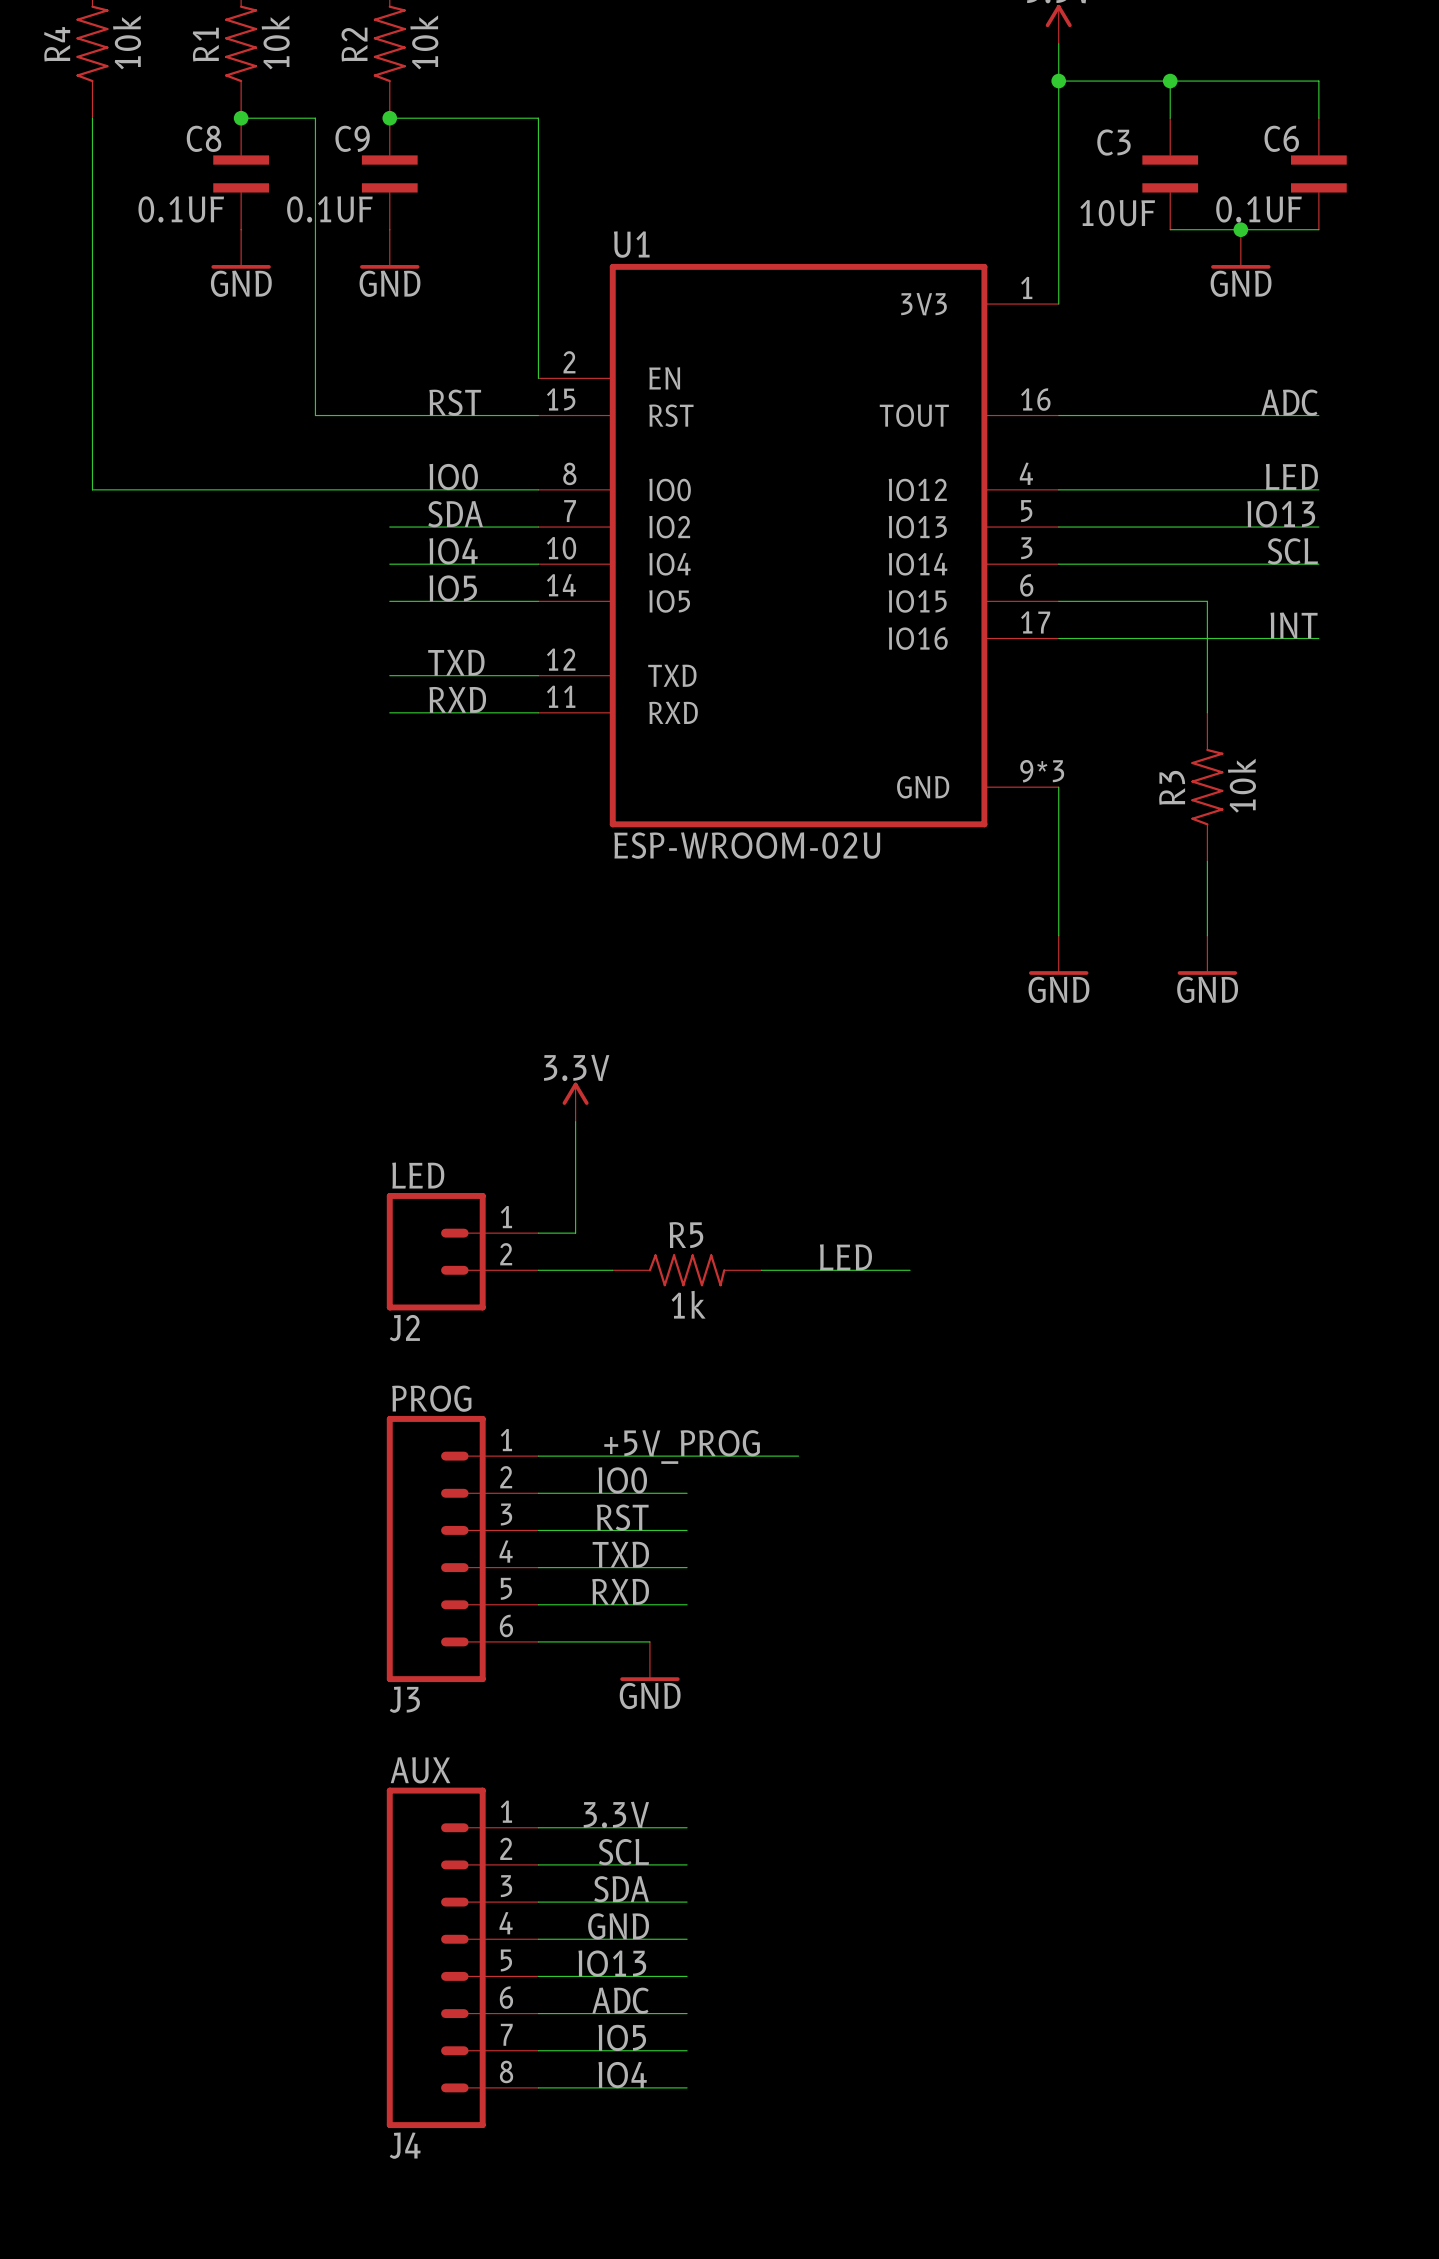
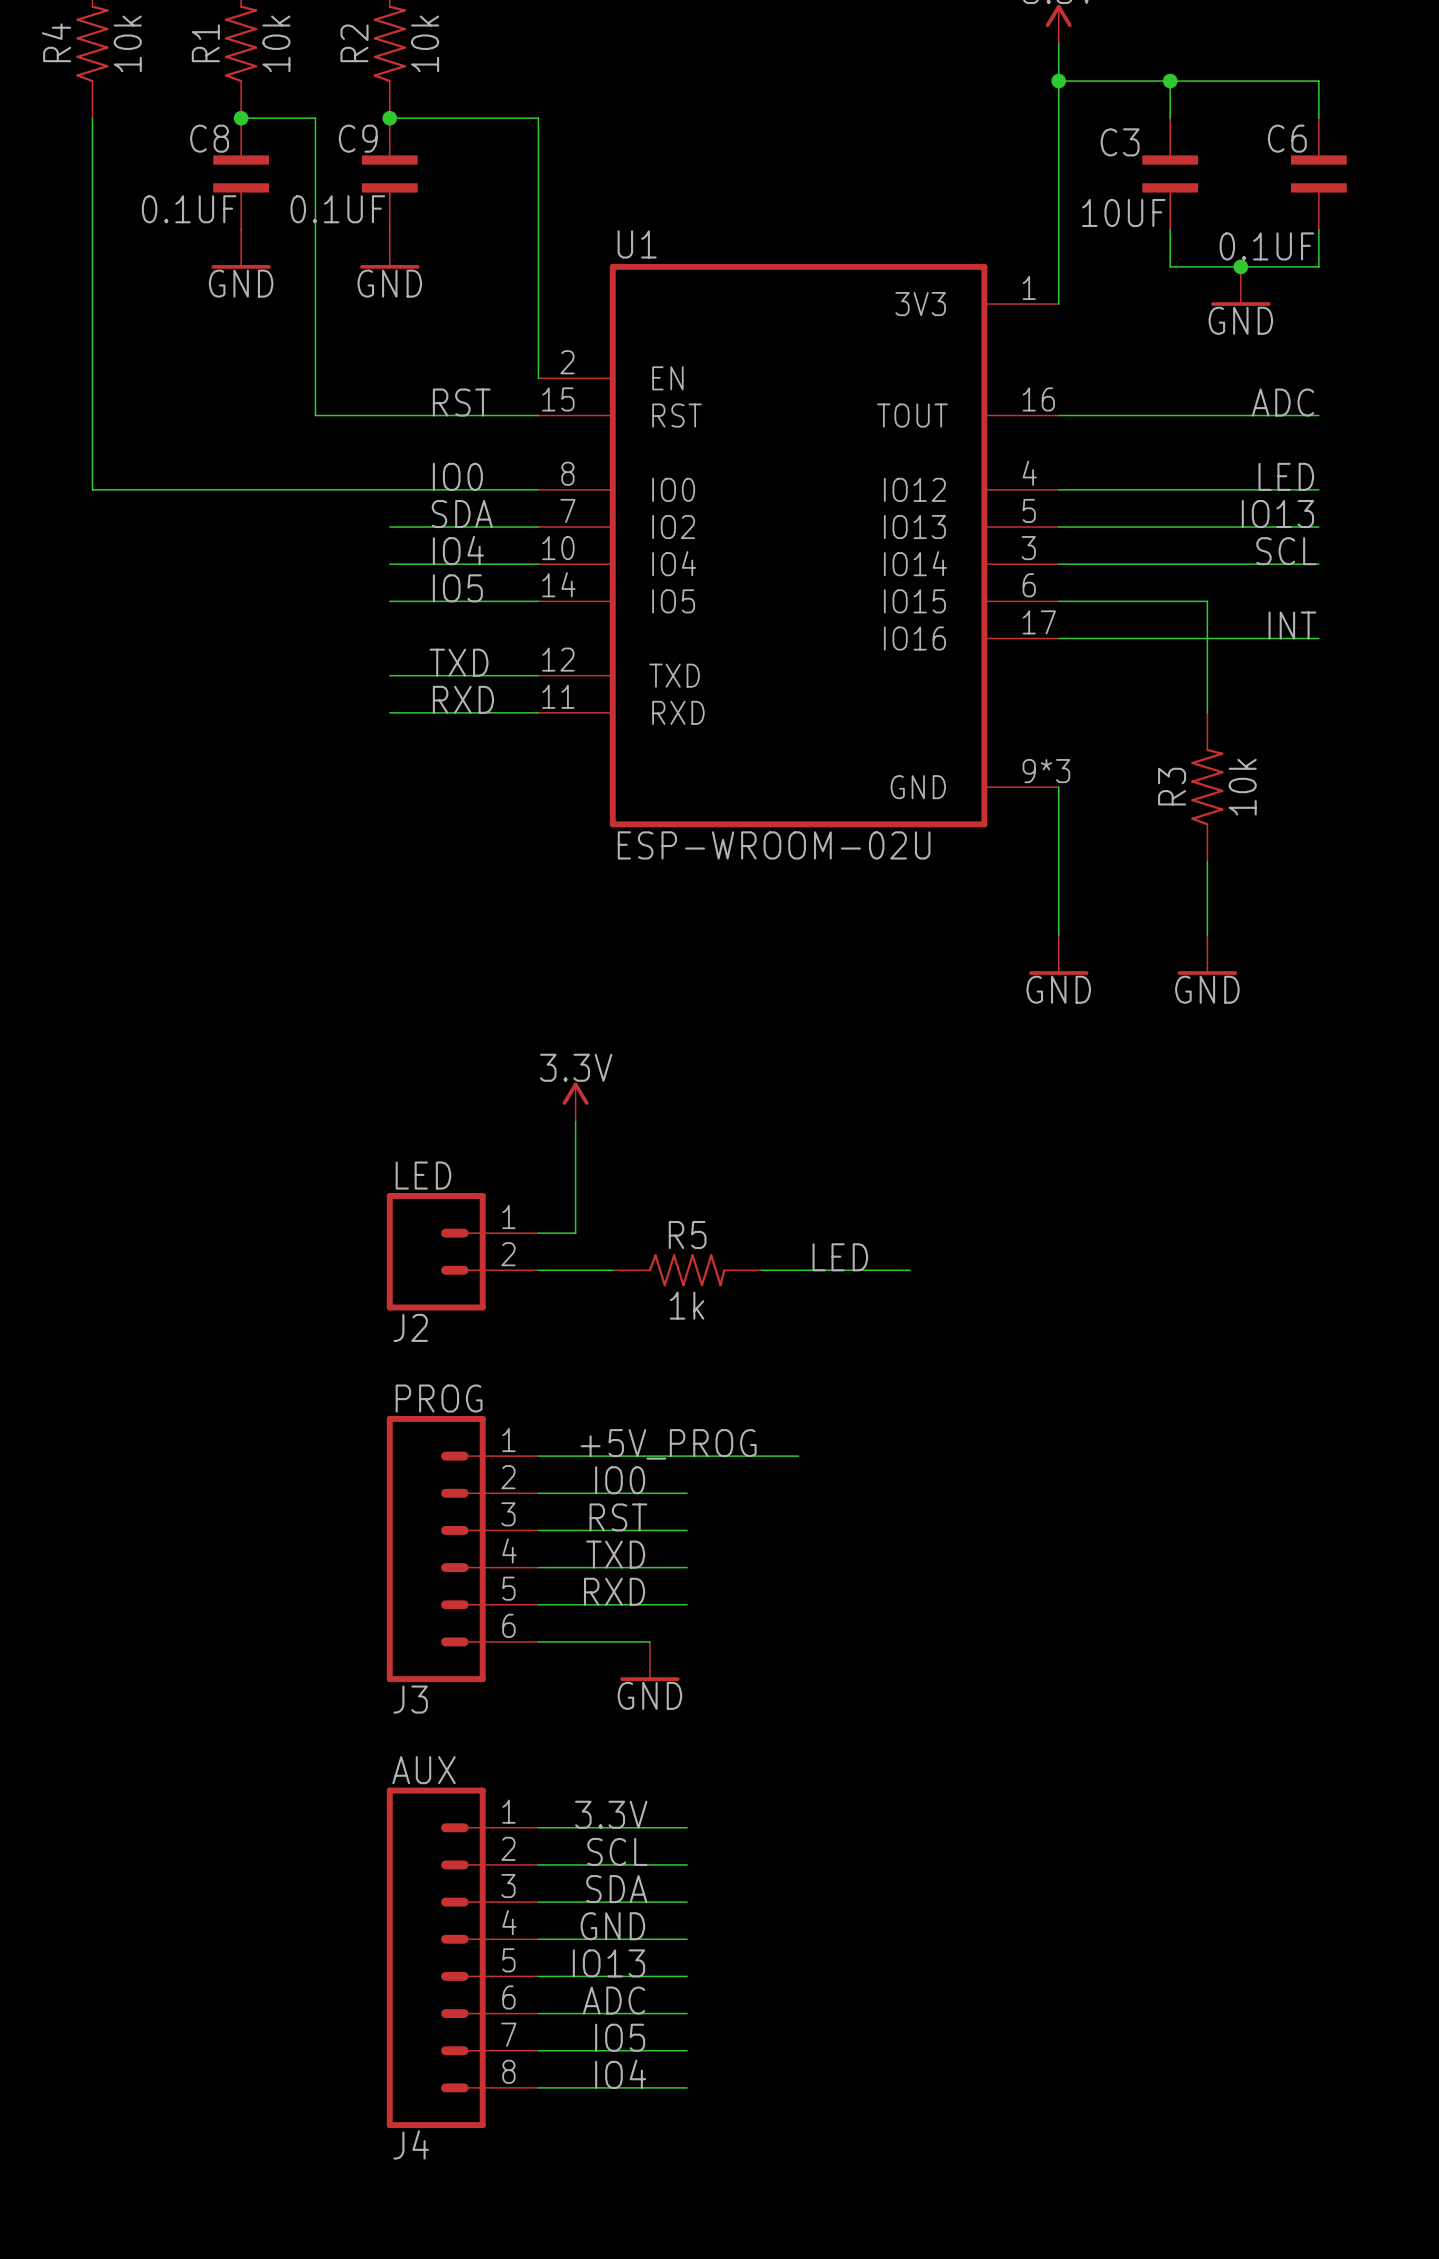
C6 value position: 0.1UF (1258, 209) -> 0.1UF (1266, 246)
wire: (1170, 229) (1318, 229) -> (1170, 229) (1170, 266) (1318, 266) (1318, 229)
junction position: (1240, 229) -> (1240, 266)
power symbol position: GND (1240, 249) -> GND (1240, 286)

